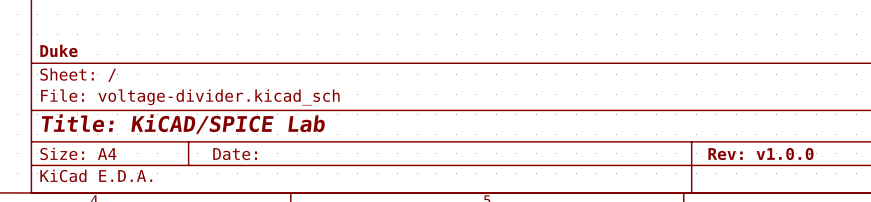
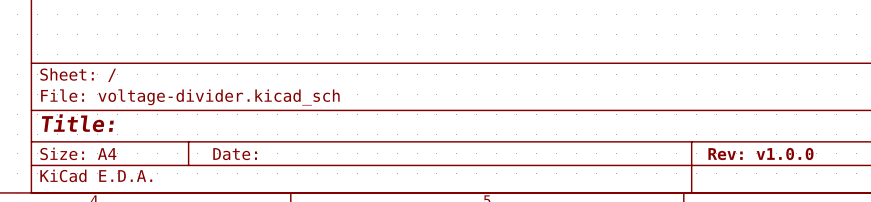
title block: Duke (58, 50) -> none
title block: Title: KiCAD/SPICE Lab (183, 124) -> Title: (77, 123)

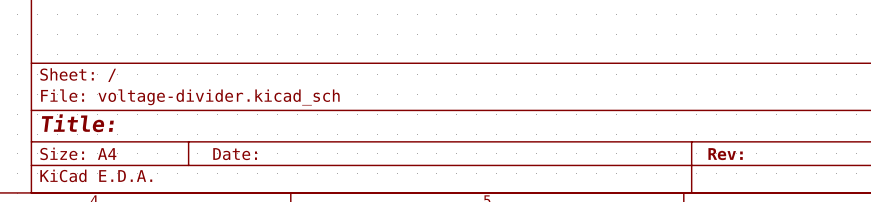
title block: Rev: v1.0.0 (760, 154) -> Rev: (725, 154)

